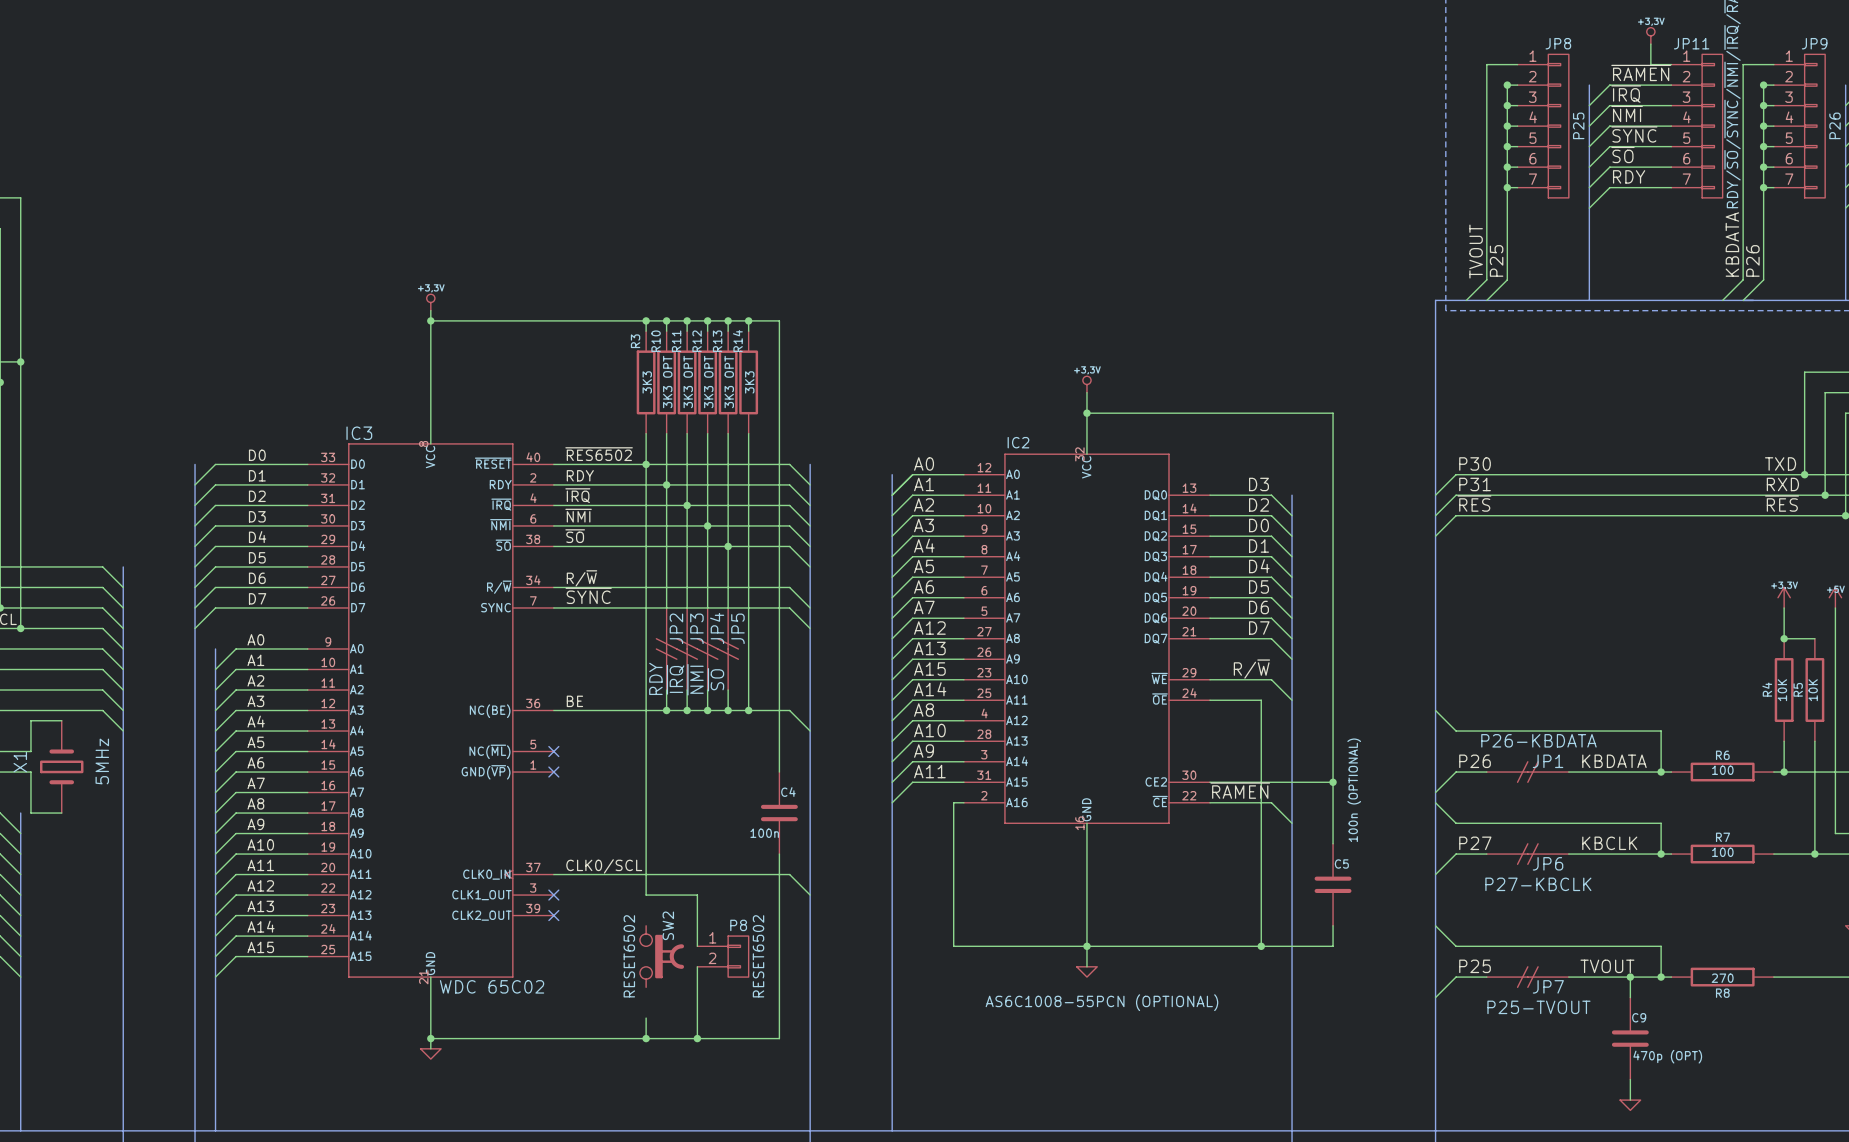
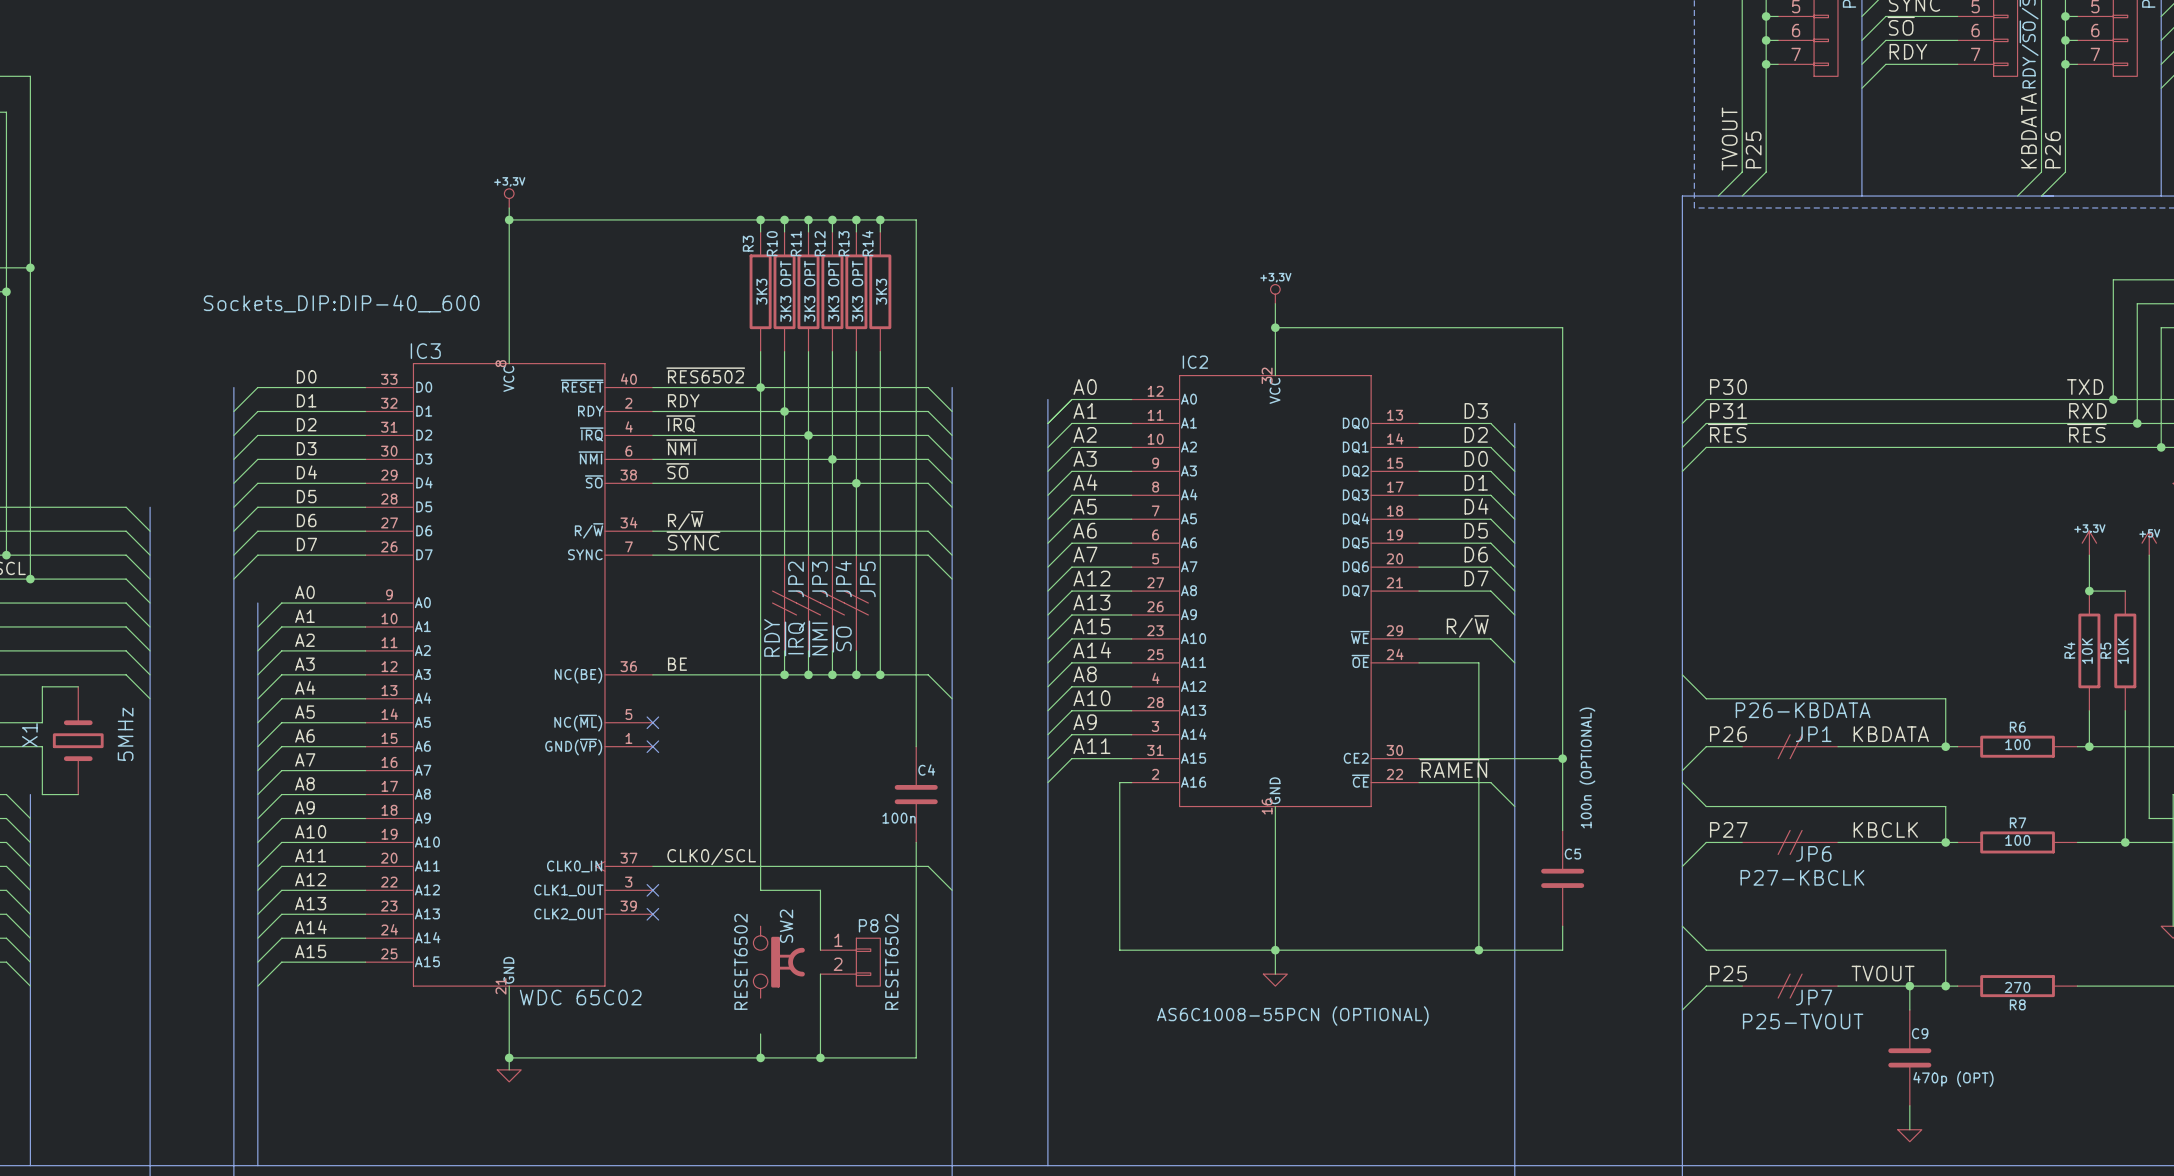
IC3 text: none -> Sockets_DIP:DIP-40__600 (341, 303)

